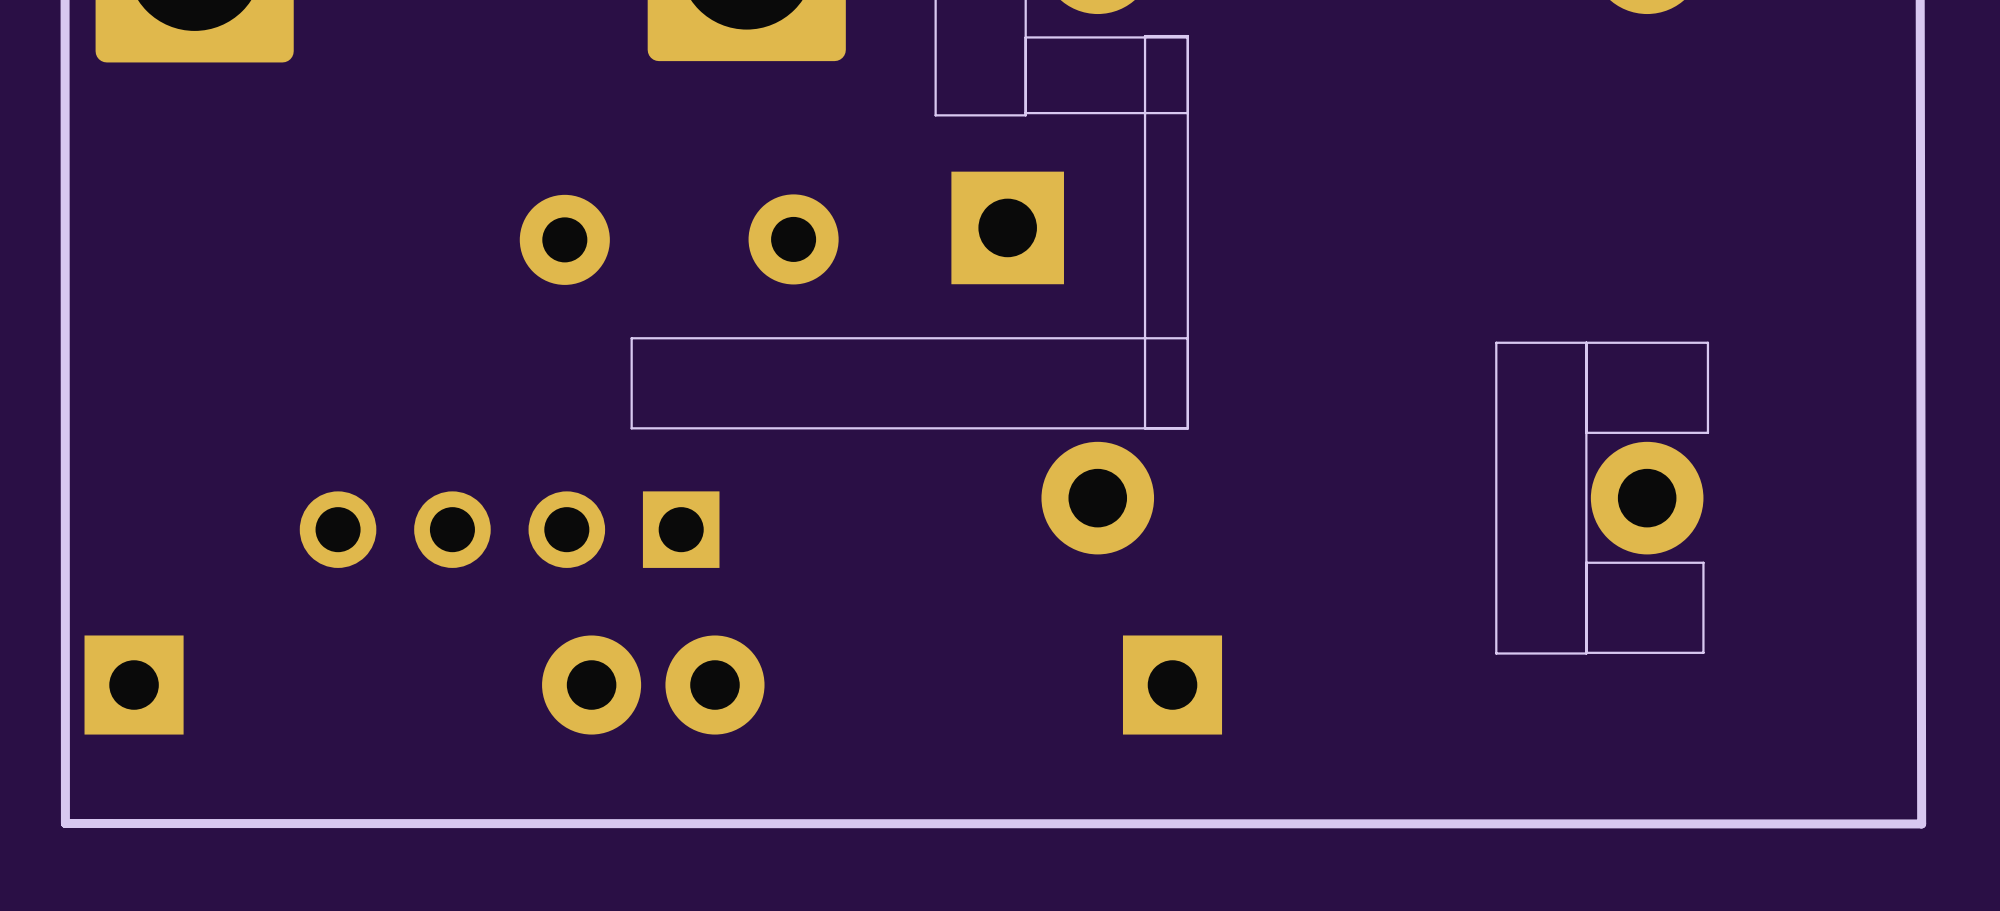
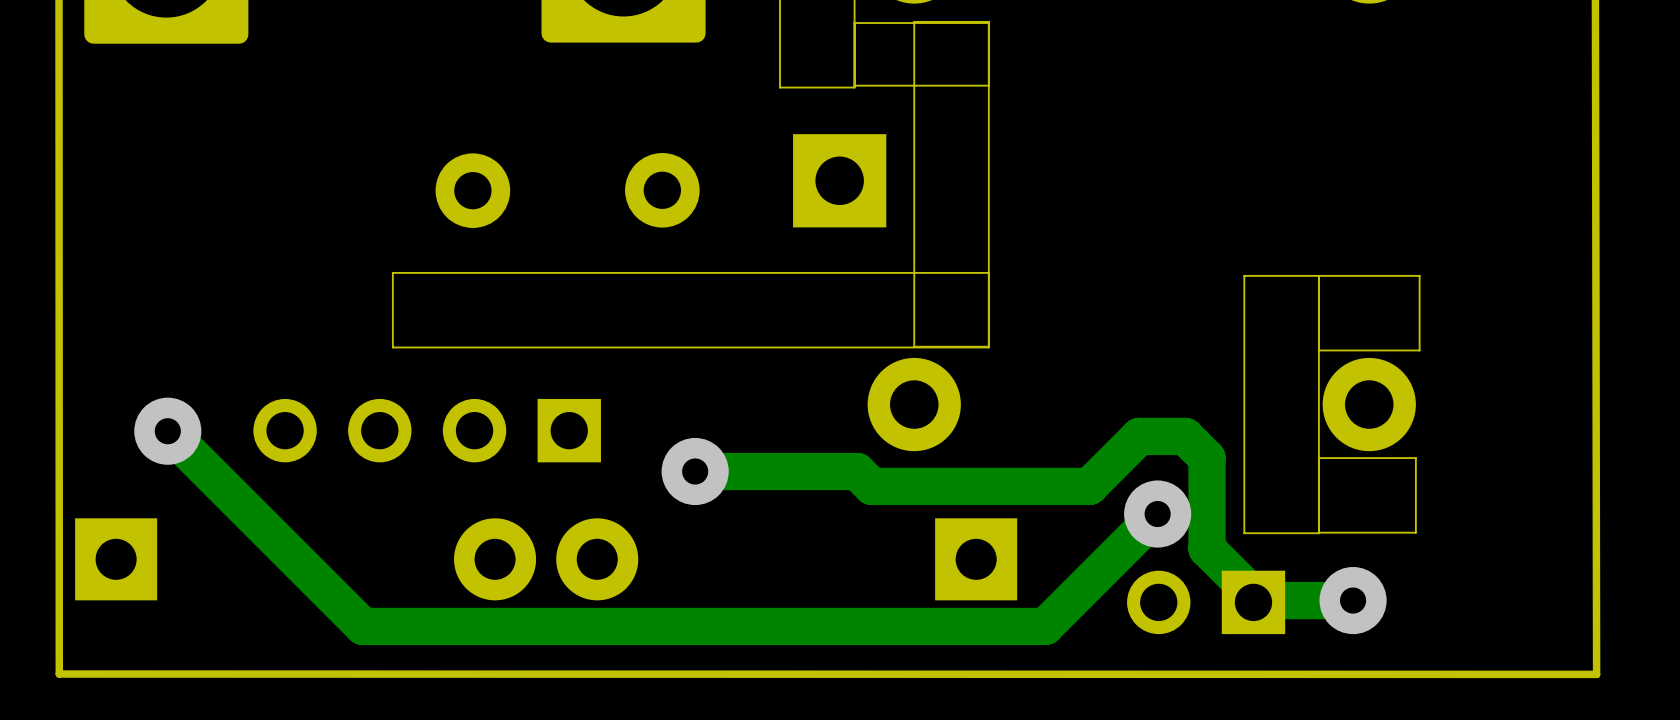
board edge: (1145, 36) (1145, 428) -> (953, 21) (914, 21) (914, 346)
board edge: (1187, 338) (631, 338) (631, 428) (1097, 428) -> (988, 272) (392, 272) (392, 347) (988, 347)
track: none -> (167, 431) (363, 626) (1045, 626) (1157, 514)
via: none -> (167, 431)
track: none -> (695, 471) (857, 471) (871, 486) (1089, 486) (1139, 436) (1185, 436) (1207, 458) (1207, 548) (1258, 600) (1353, 600)
via: none -> (695, 471)
via: none -> (1157, 514)
via: none -> (1353, 600)
part: none -> (1206, 602)

